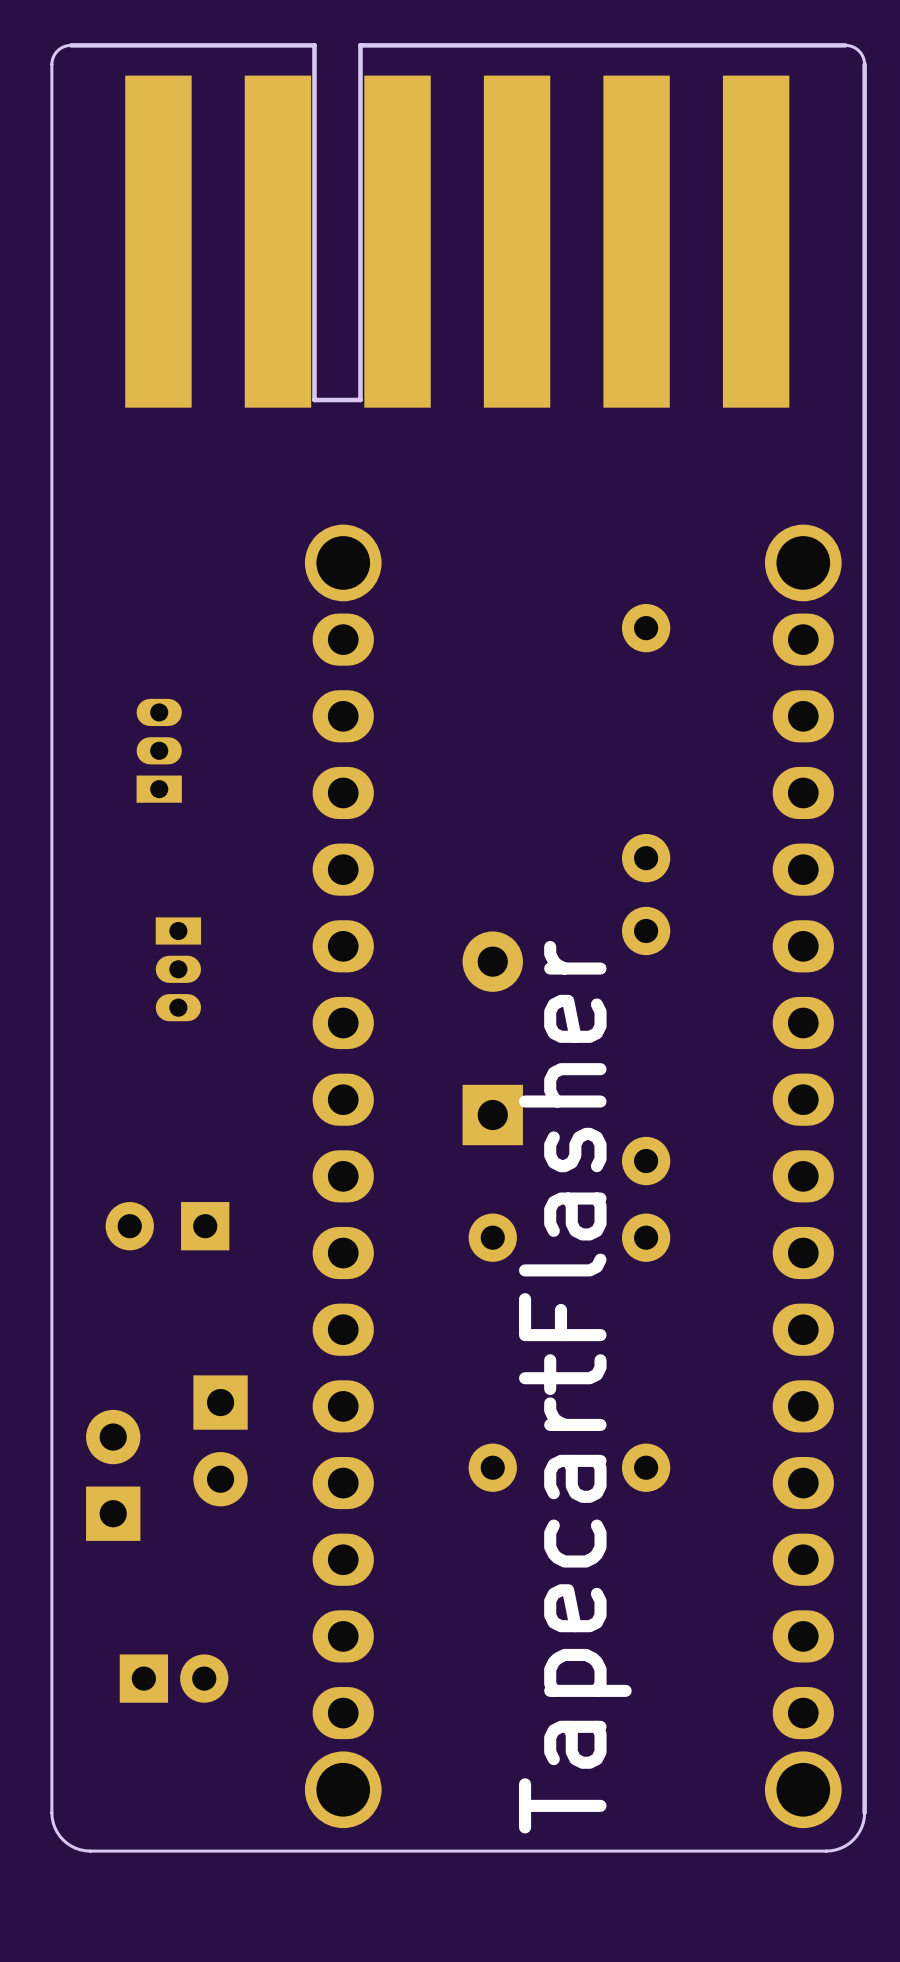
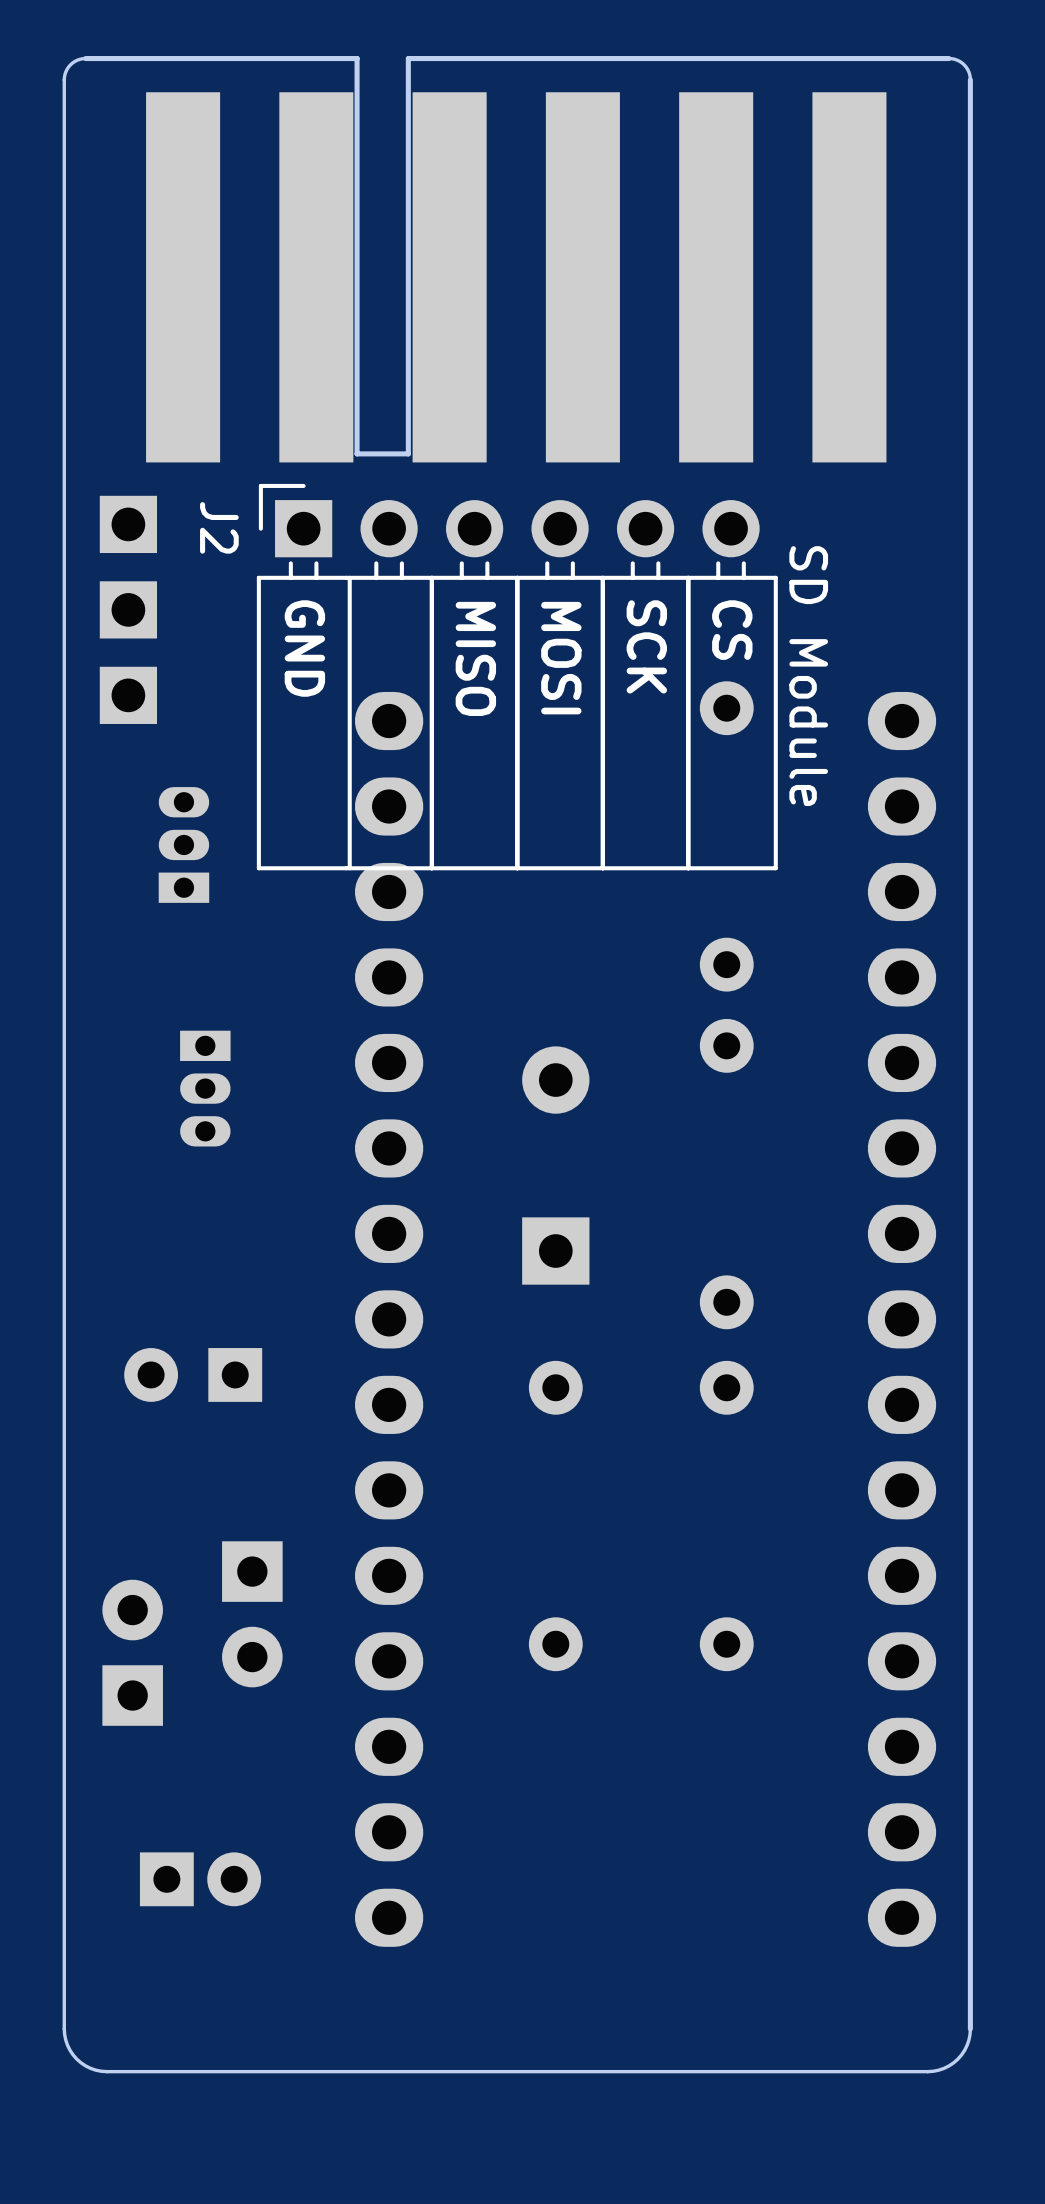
part: none -> (128, 609)
text: none -> CS (732, 630)
part: (343, 562) -> none
part: (803, 562) -> none
text: none -> SCK (646, 646)
text: none -> GND (304, 648)
text: none -> MISO (475, 658)
text: none -> MOSI (561, 658)
J2: none -> SD Module (517, 677)
text: TapecartFlasher (575, 1387) -> none
part: (343, 1789) -> none
part: (803, 1789) -> none

